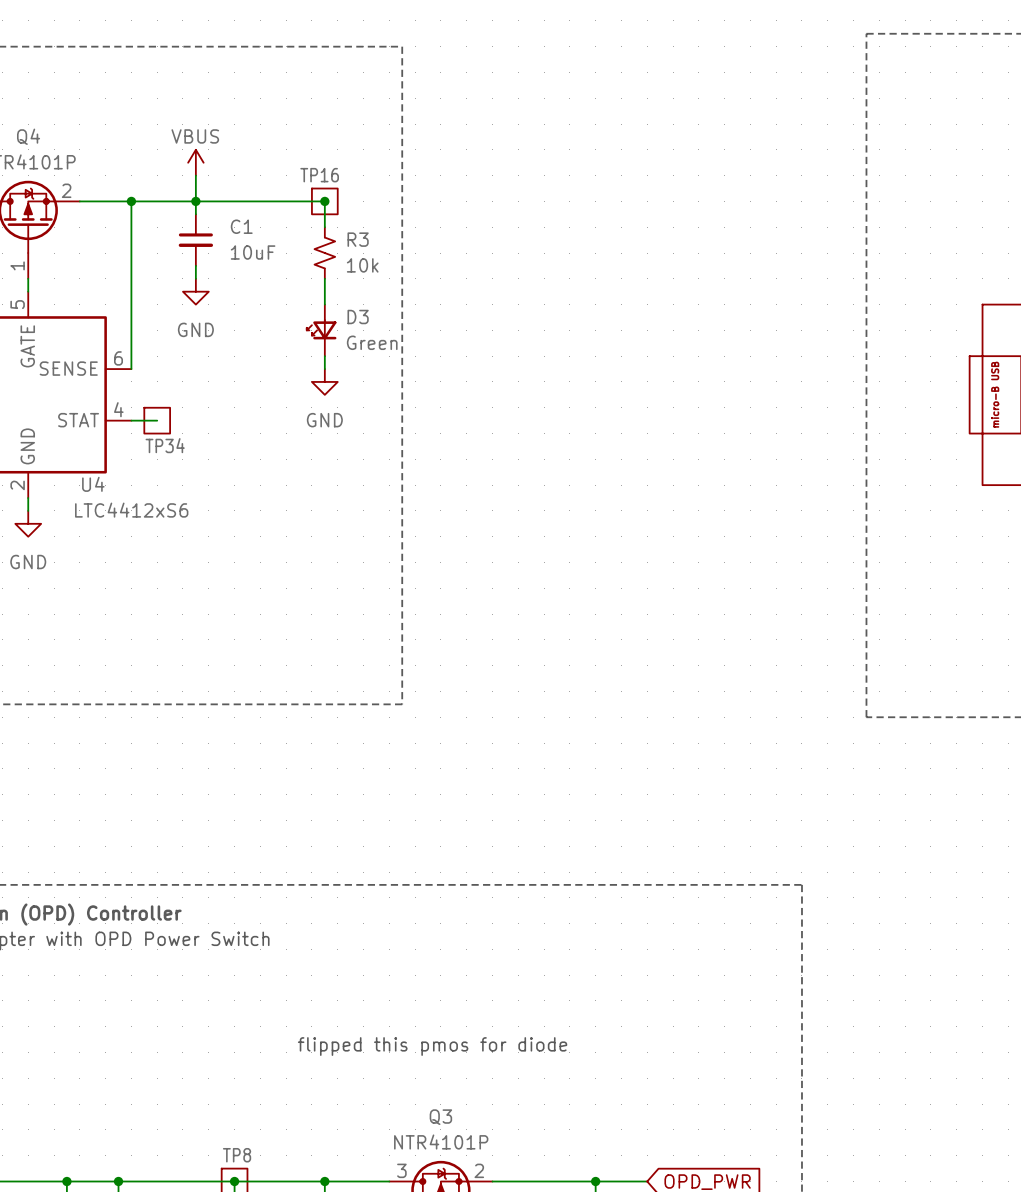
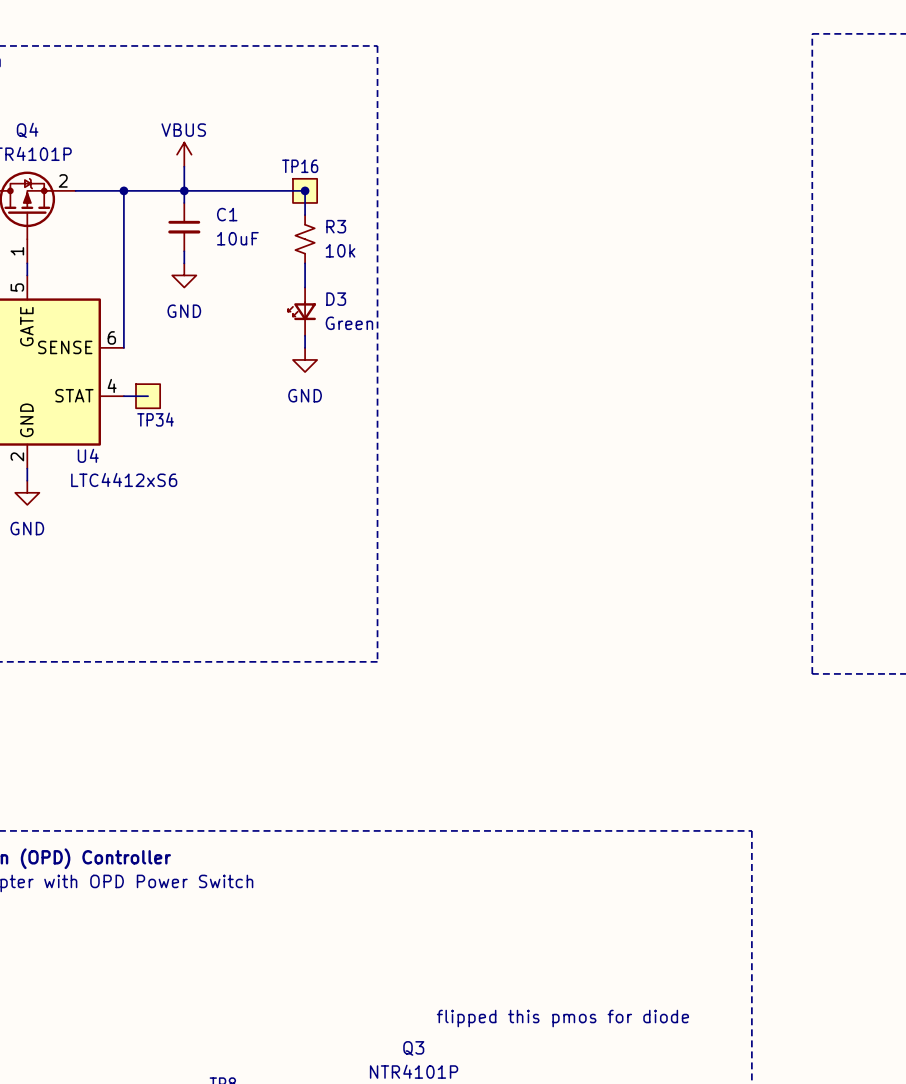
text position: flipped this pmos for diode (432, 1046) -> flipped this pmos for diode (562, 1018)

